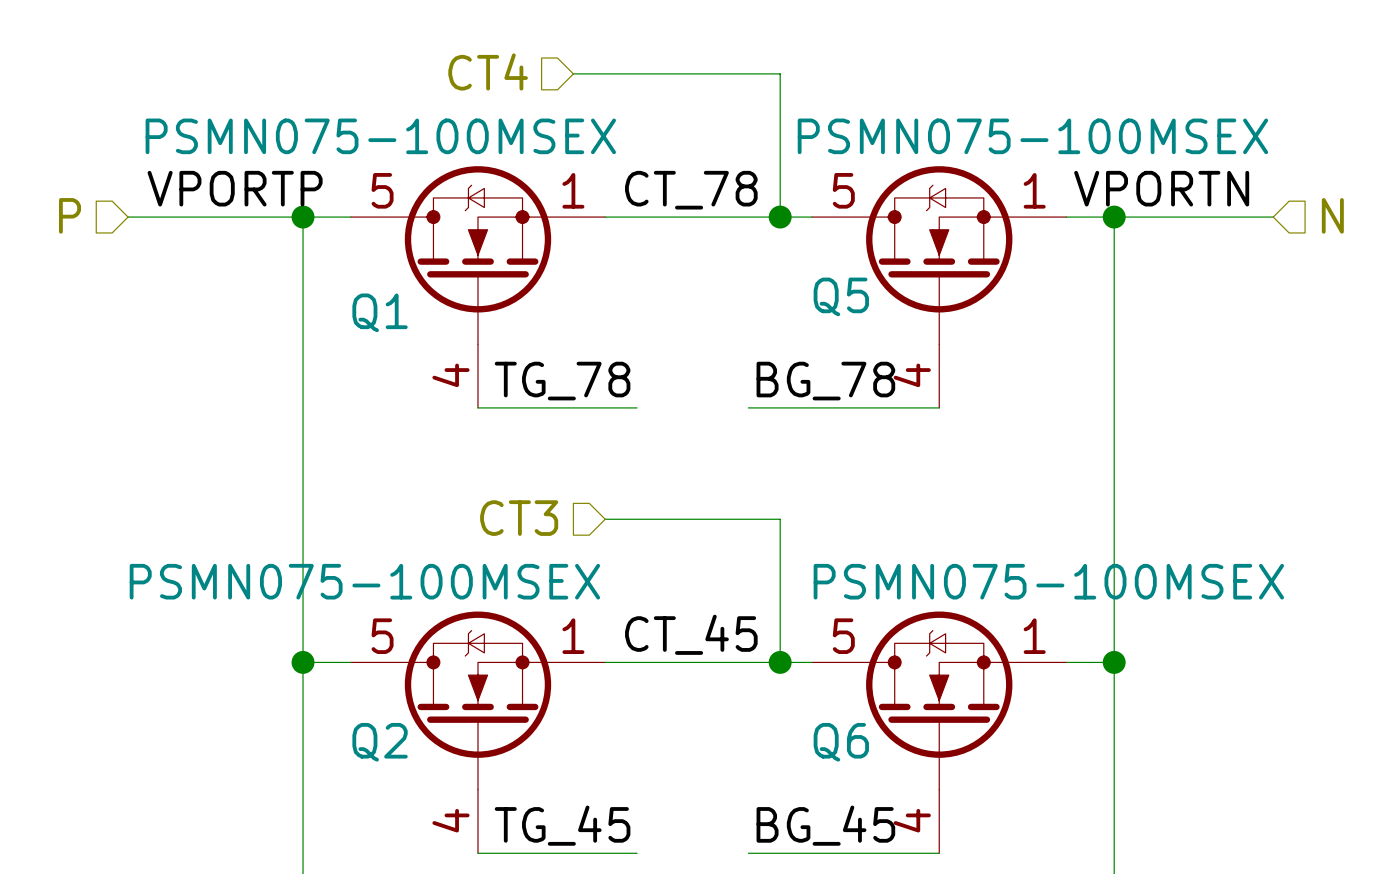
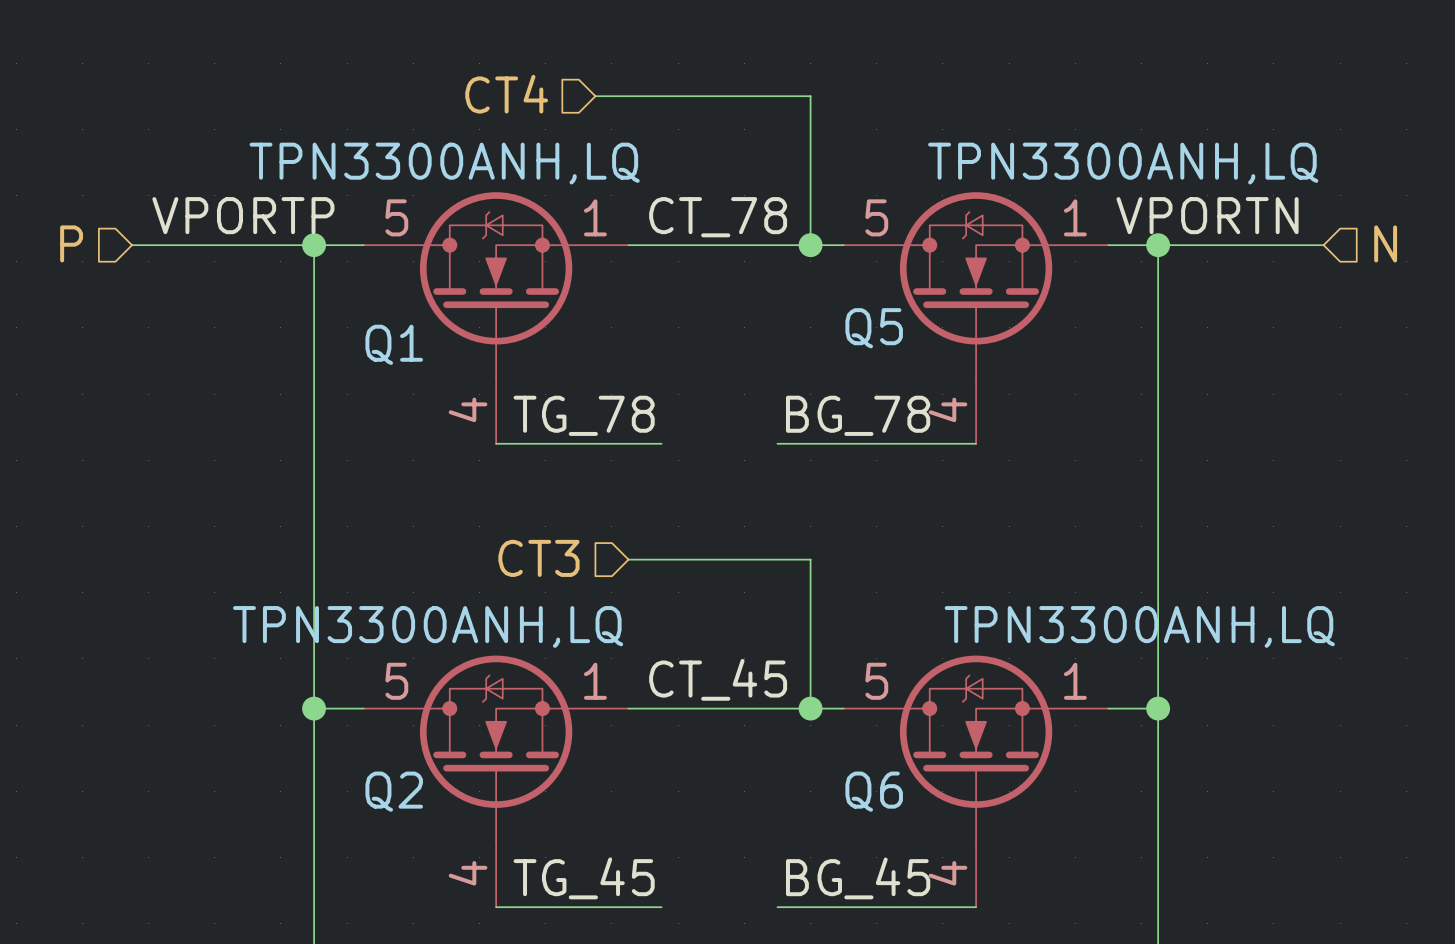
Q1 value: PSMN075-100MSEX (380, 136) -> TPN3300ANH,LQ (444, 163)
Q5 value: PSMN075-100MSEX (1032, 136) -> TPN3300ANH,LQ (1123, 163)
Q2 value: PSMN075-100MSEX (364, 581) -> TPN3300ANH,LQ (428, 626)
Q6 value: PSMN075-100MSEX (1048, 581) -> TPN3300ANH,LQ (1139, 626)

